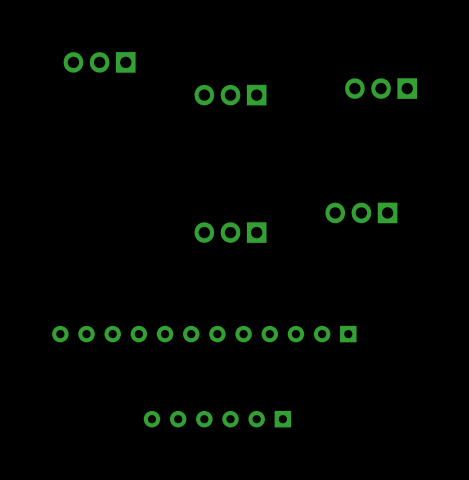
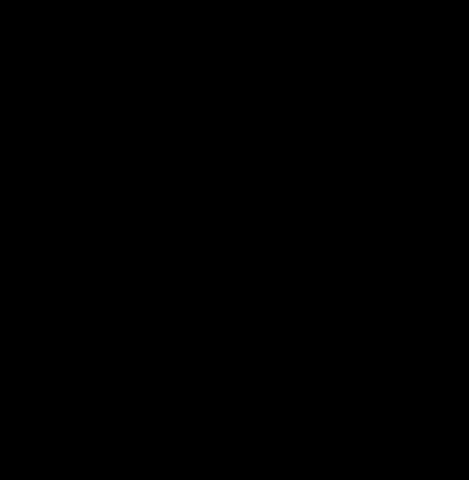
part: (99, 62) -> none
part: (381, 88) -> none
part: (230, 95) -> none
part: (361, 212) -> none
part: (230, 232) -> none
part: (204, 334) -> none
part: (217, 419) -> none

